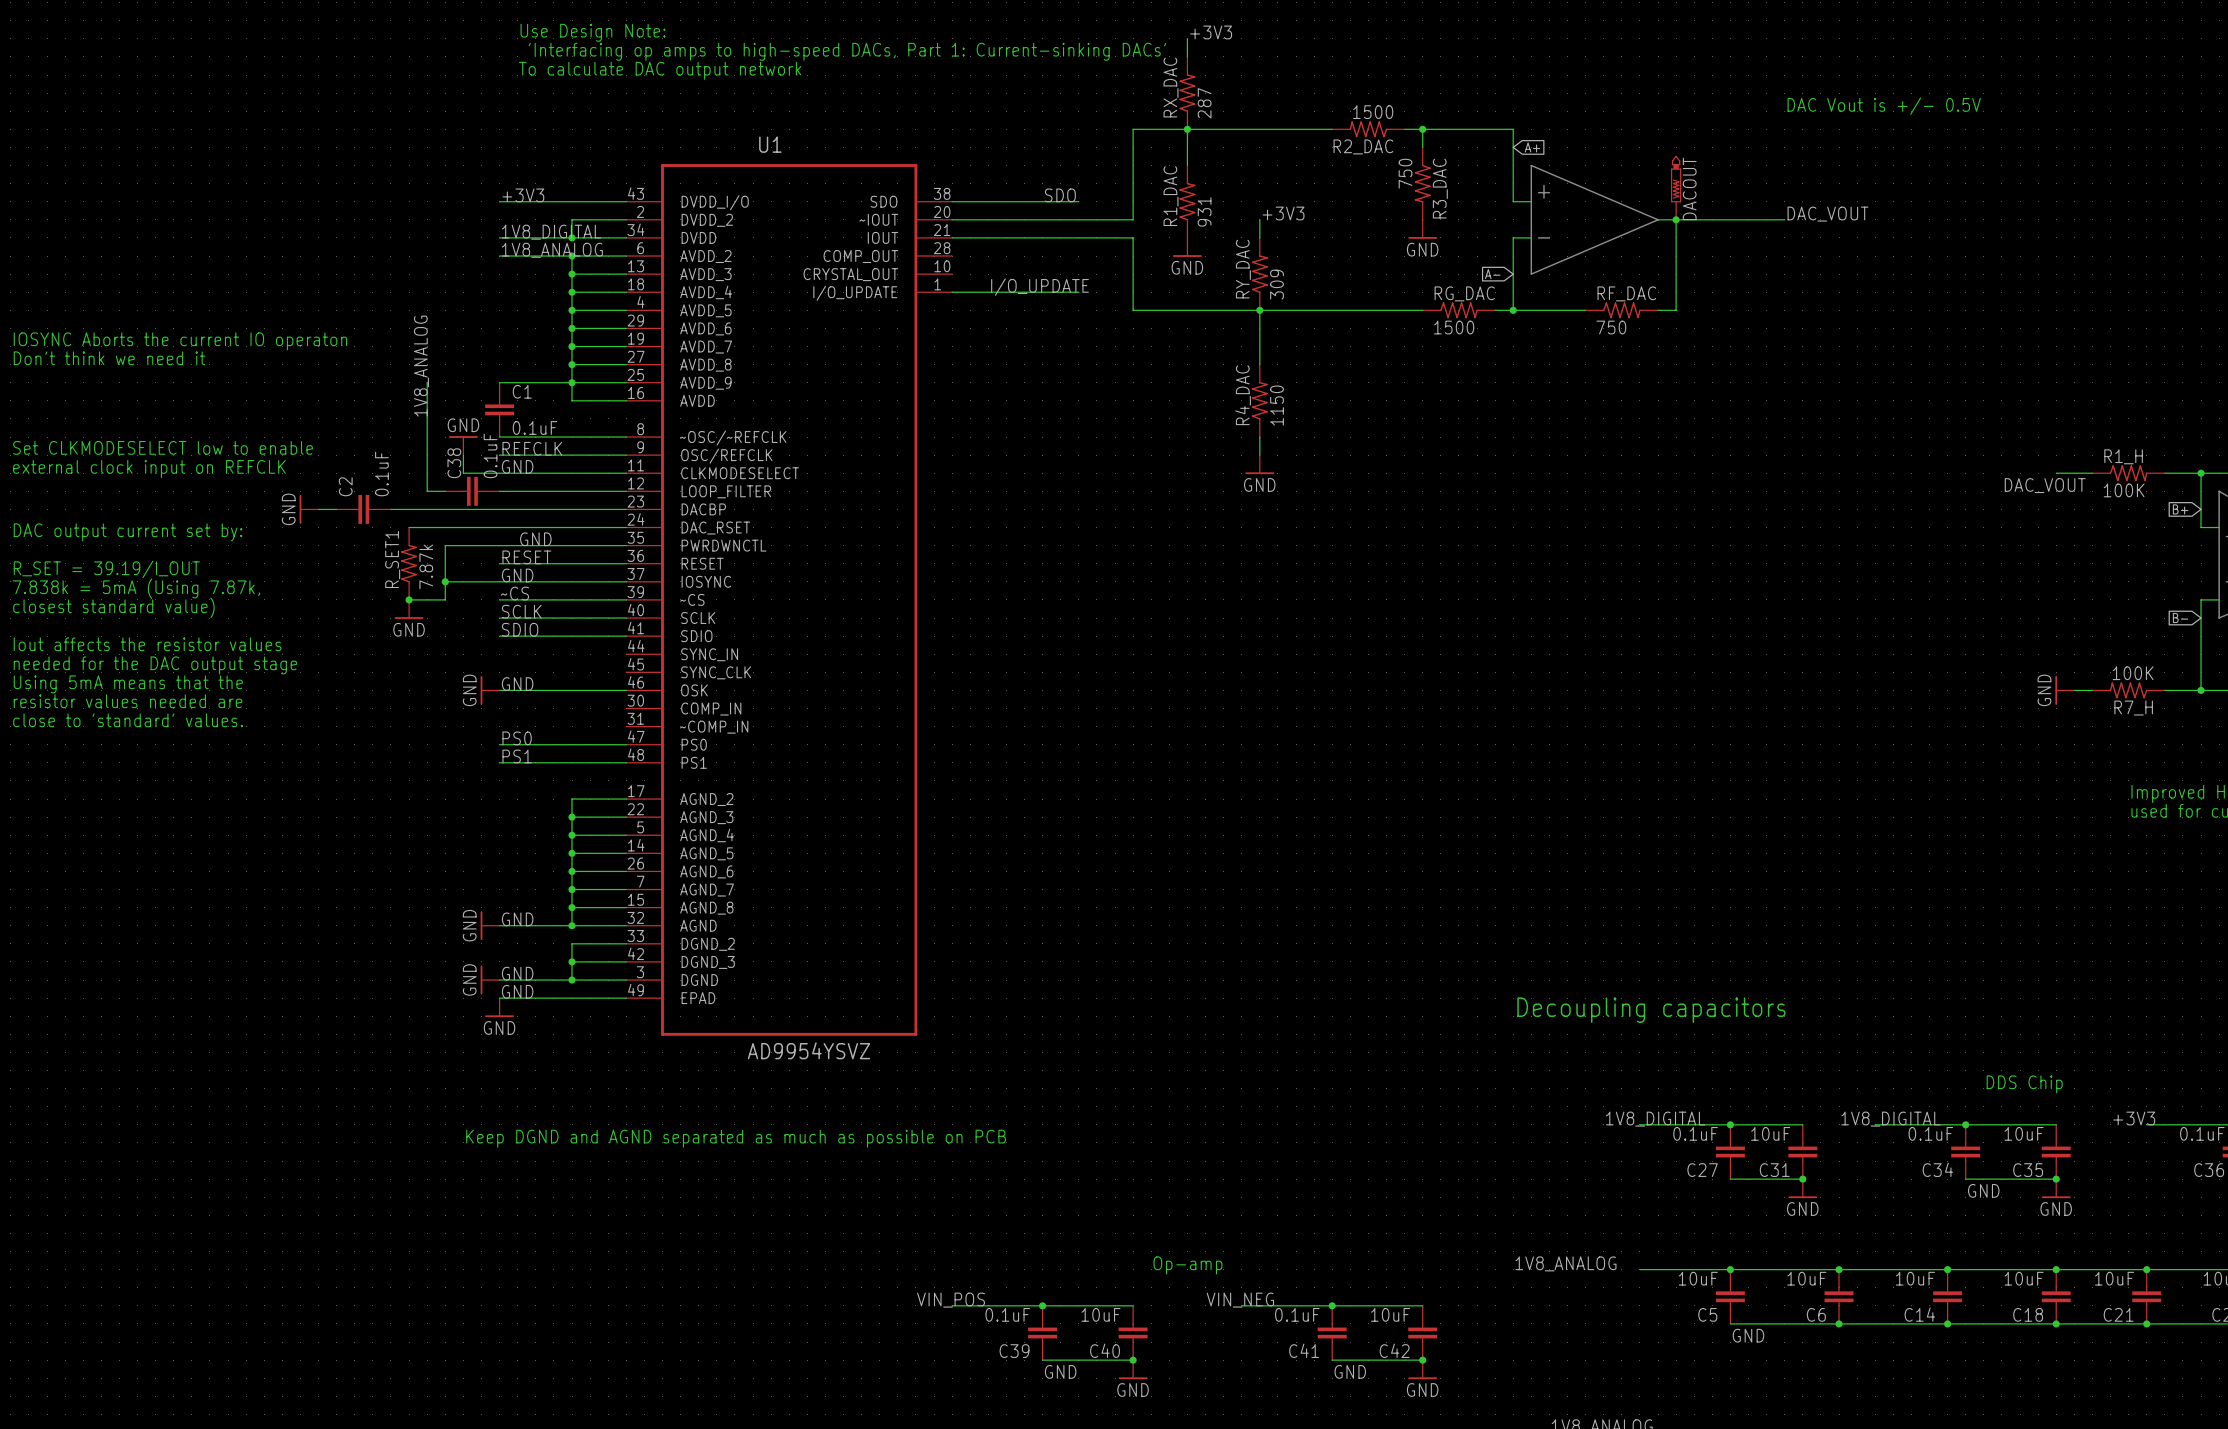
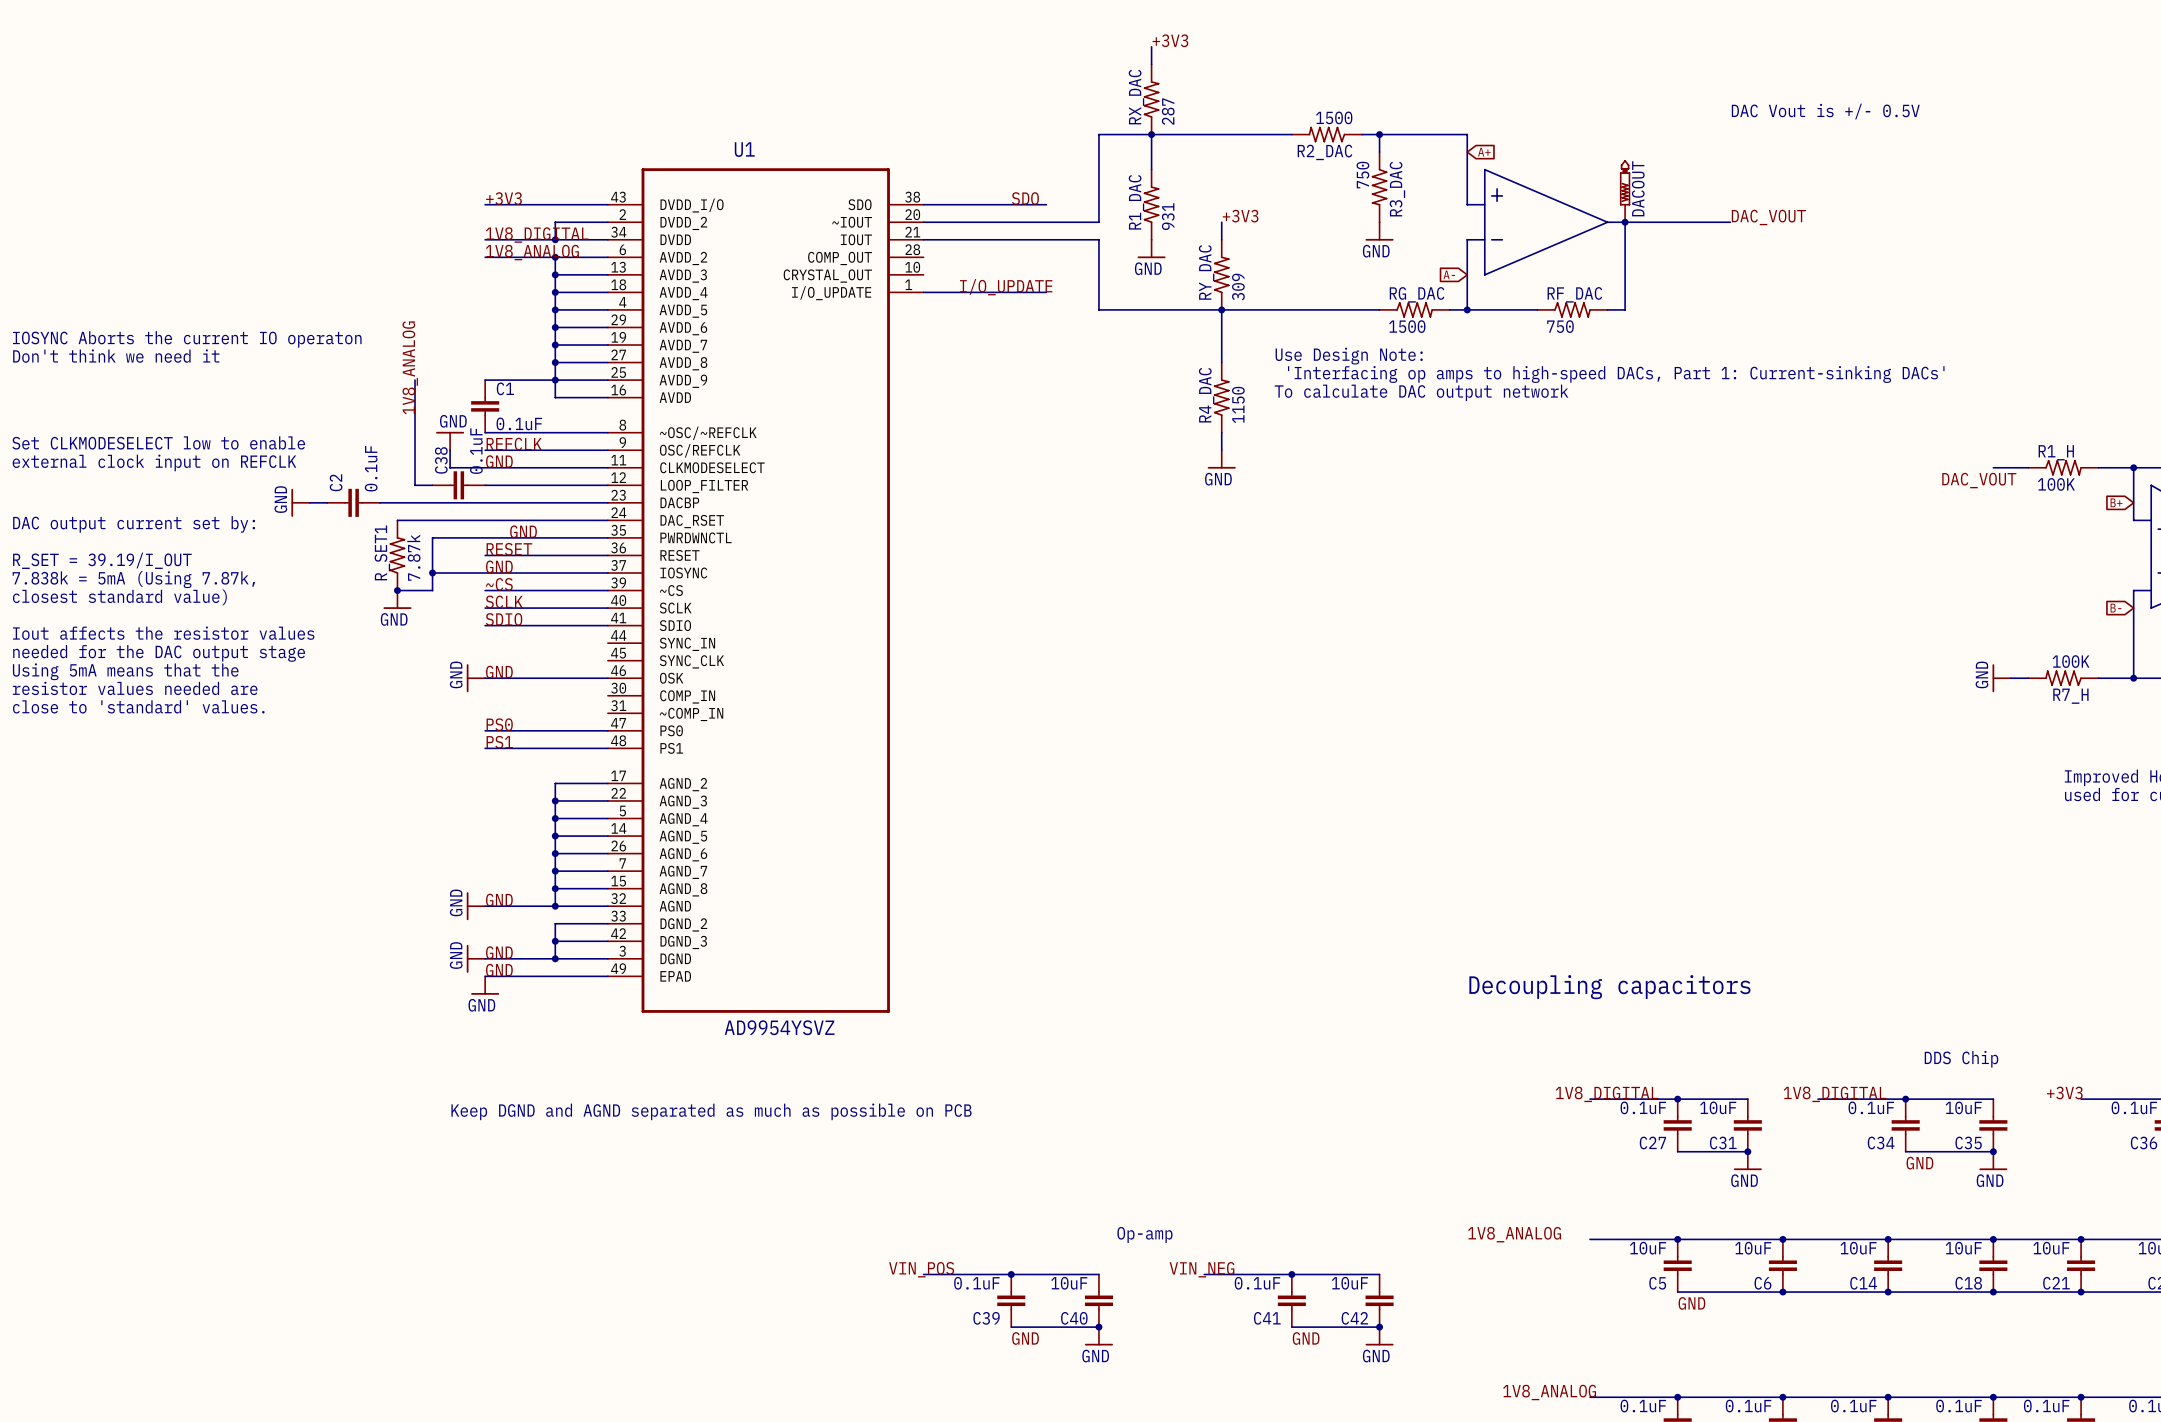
text: Use Design Note: (593, 32) -> none
text: 'Interfacing op amps to high-speed DACs, Part 1: Current-sinking DACs' (847, 51) -> none
text: To calculate DAC output network (660, 70) -> none
text: none -> Use Design Note: (1349, 356)
text: none -> 'Interfacing op amps to high-speed DACs, Part 1: Current-sinking DACs' (1616, 374)
text: none -> To calculate DAC output network (1421, 392)

